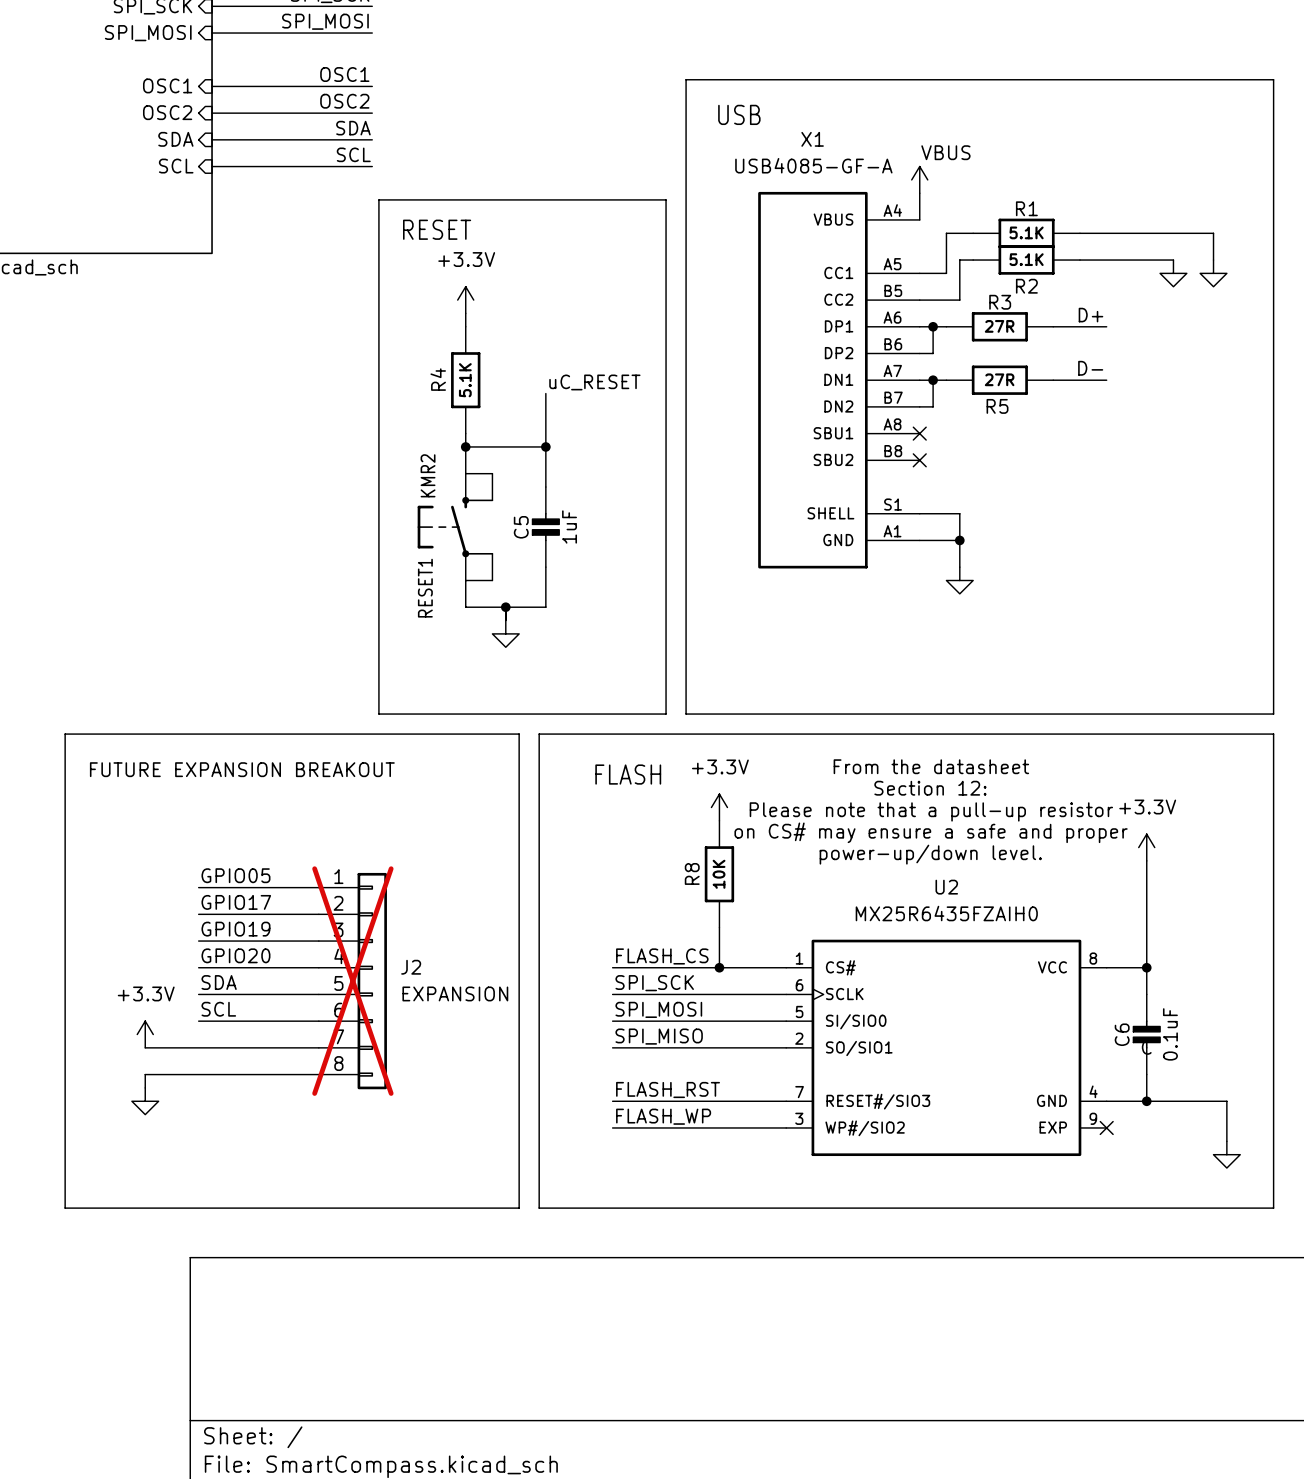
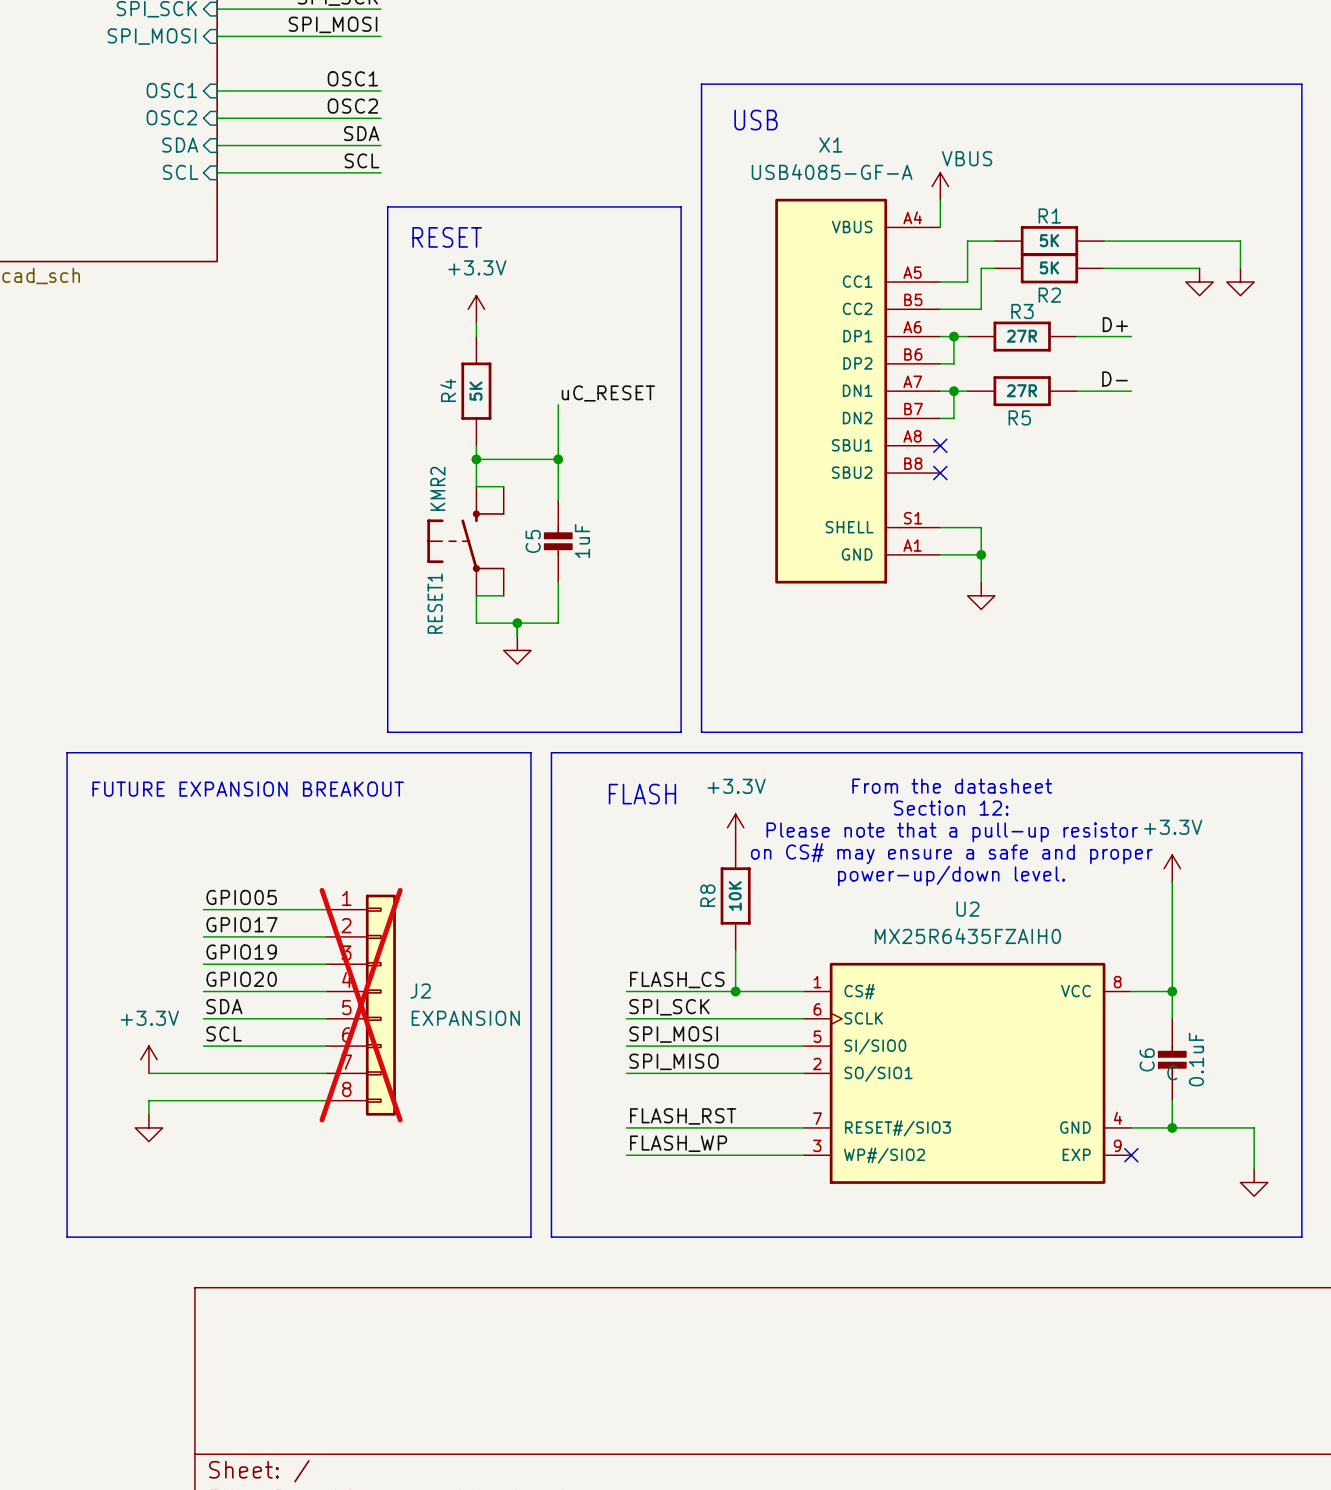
R1 value: 5.1K (1026, 232) -> 5K (1049, 240)
R2 value: 5.1K (1026, 259) -> 5K (1049, 267)
R4 value: 5.1K (465, 380) -> 5K (475, 391)

